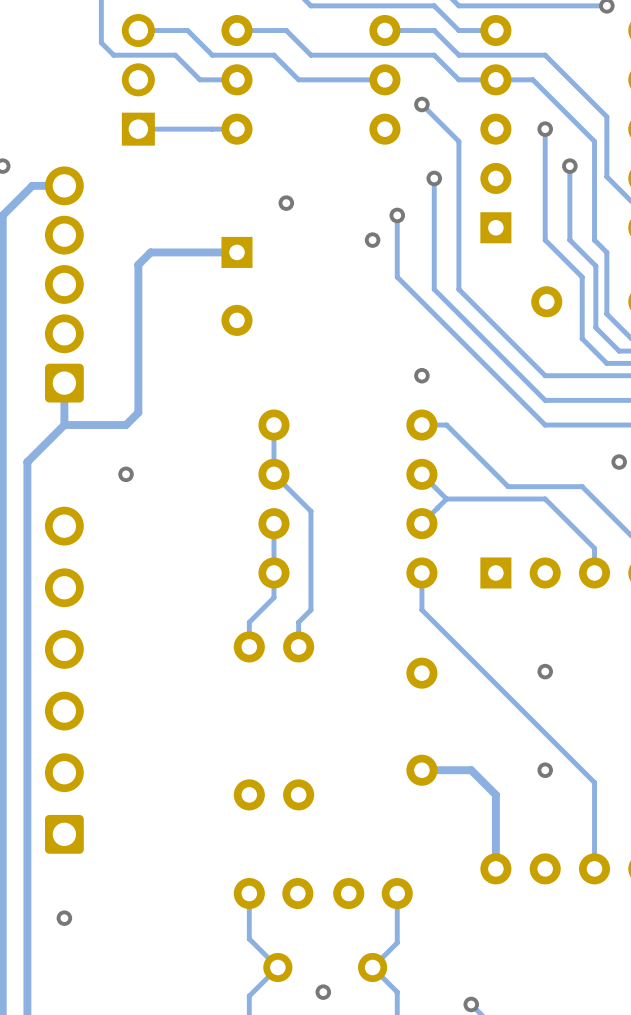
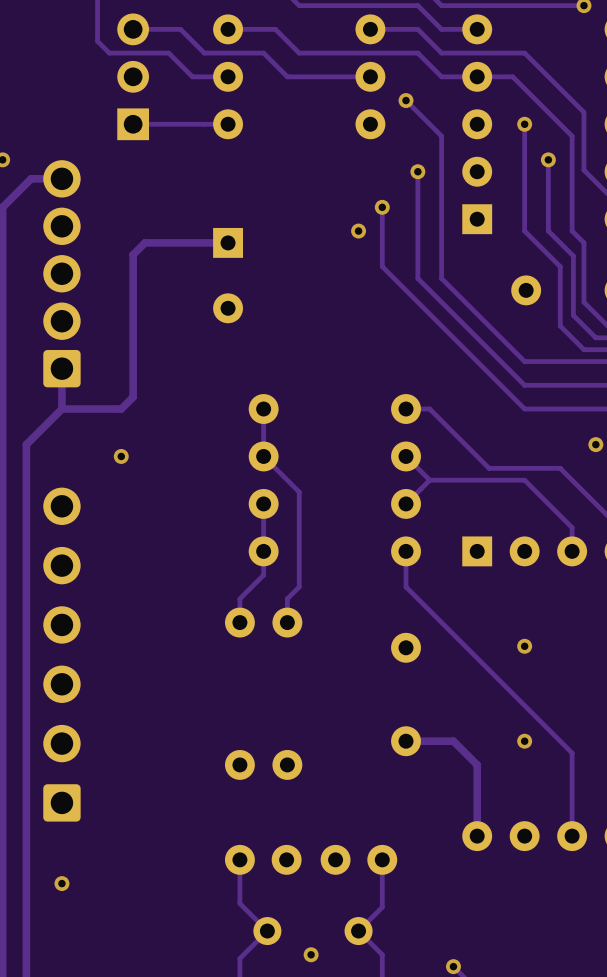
via: (286, 203) -> none
via: (421, 375) -> none

